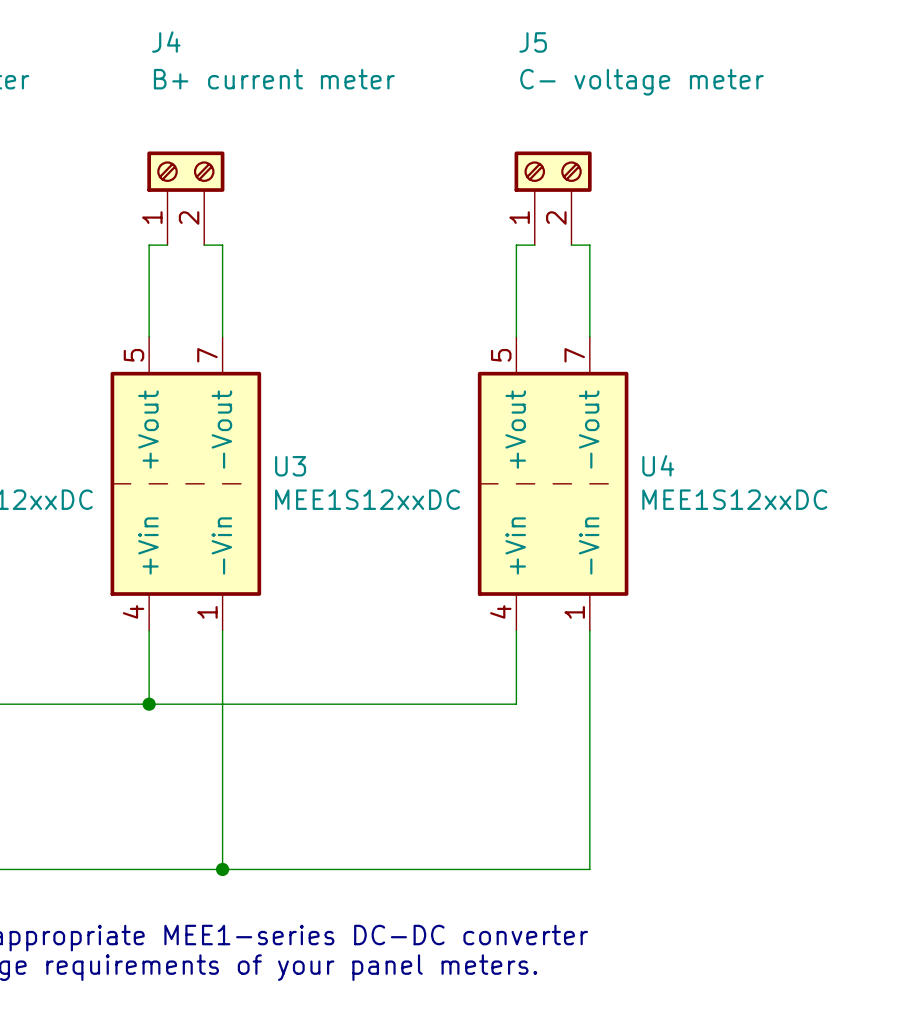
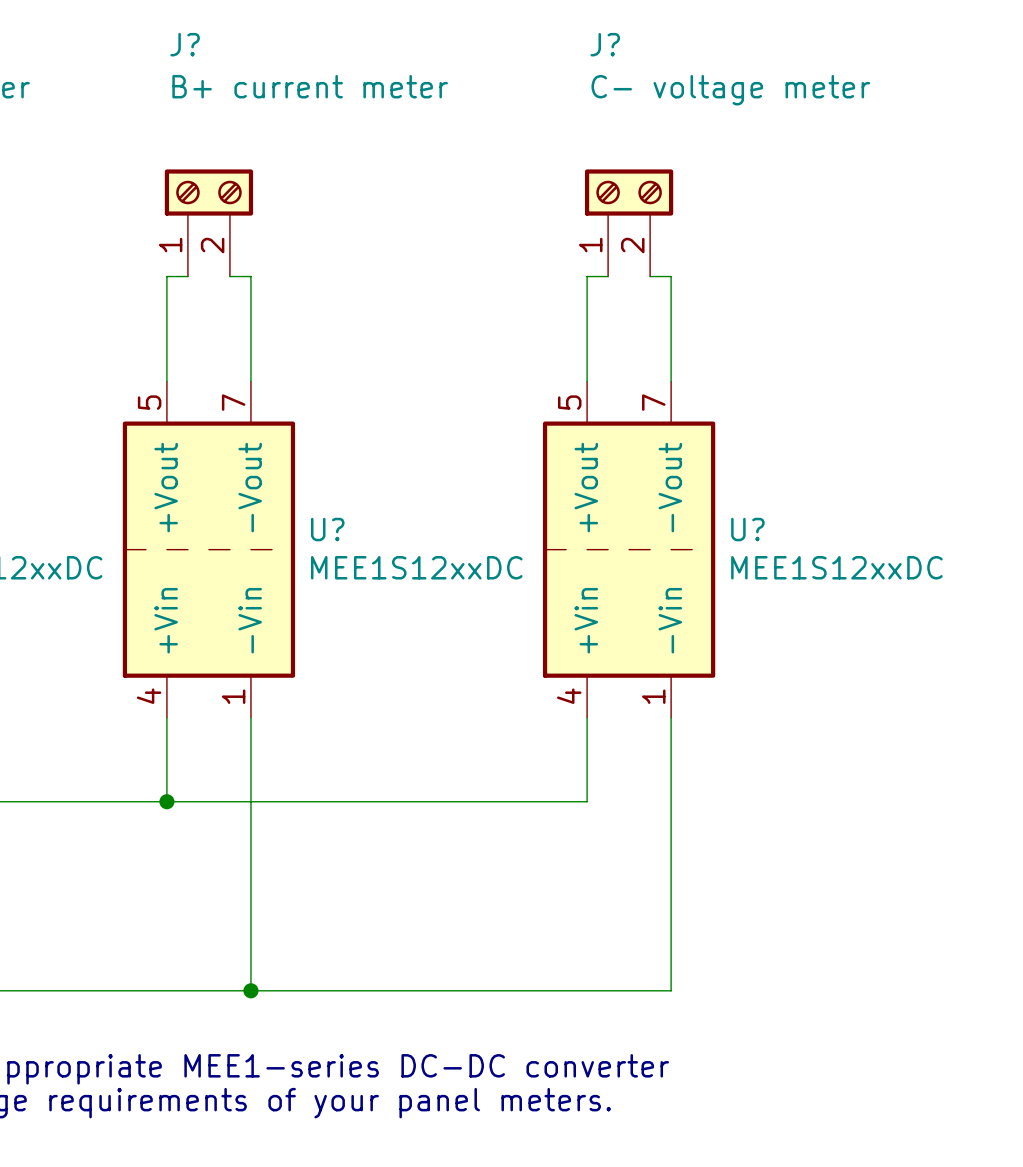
J4 name: J4 (166, 42) -> J? (185, 44)
J5 name: J5 (533, 42) -> J? (605, 44)
U4 name: U4 (658, 465) -> U? (747, 529)
U3 name: U3 (290, 466) -> U? (327, 529)

